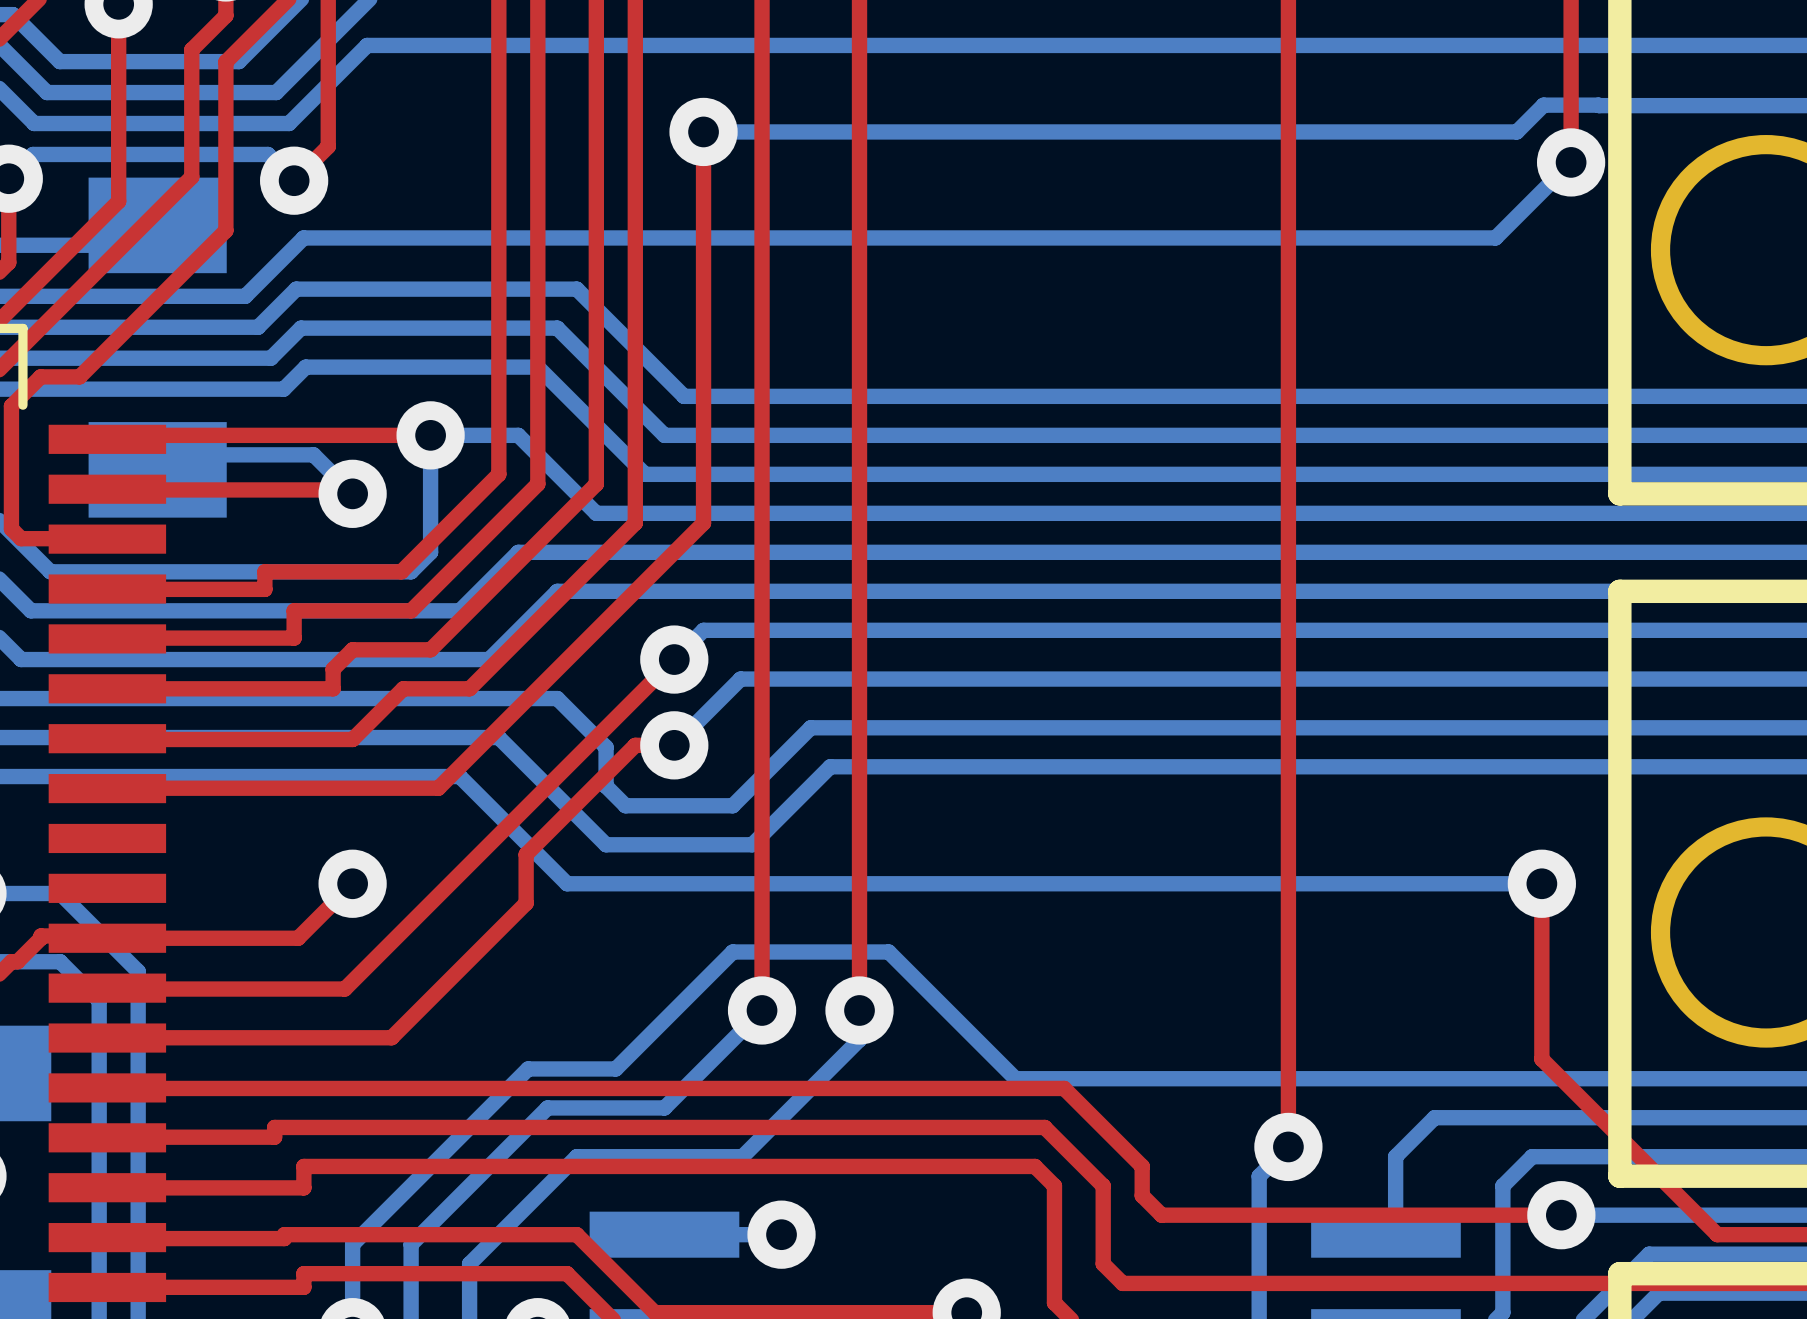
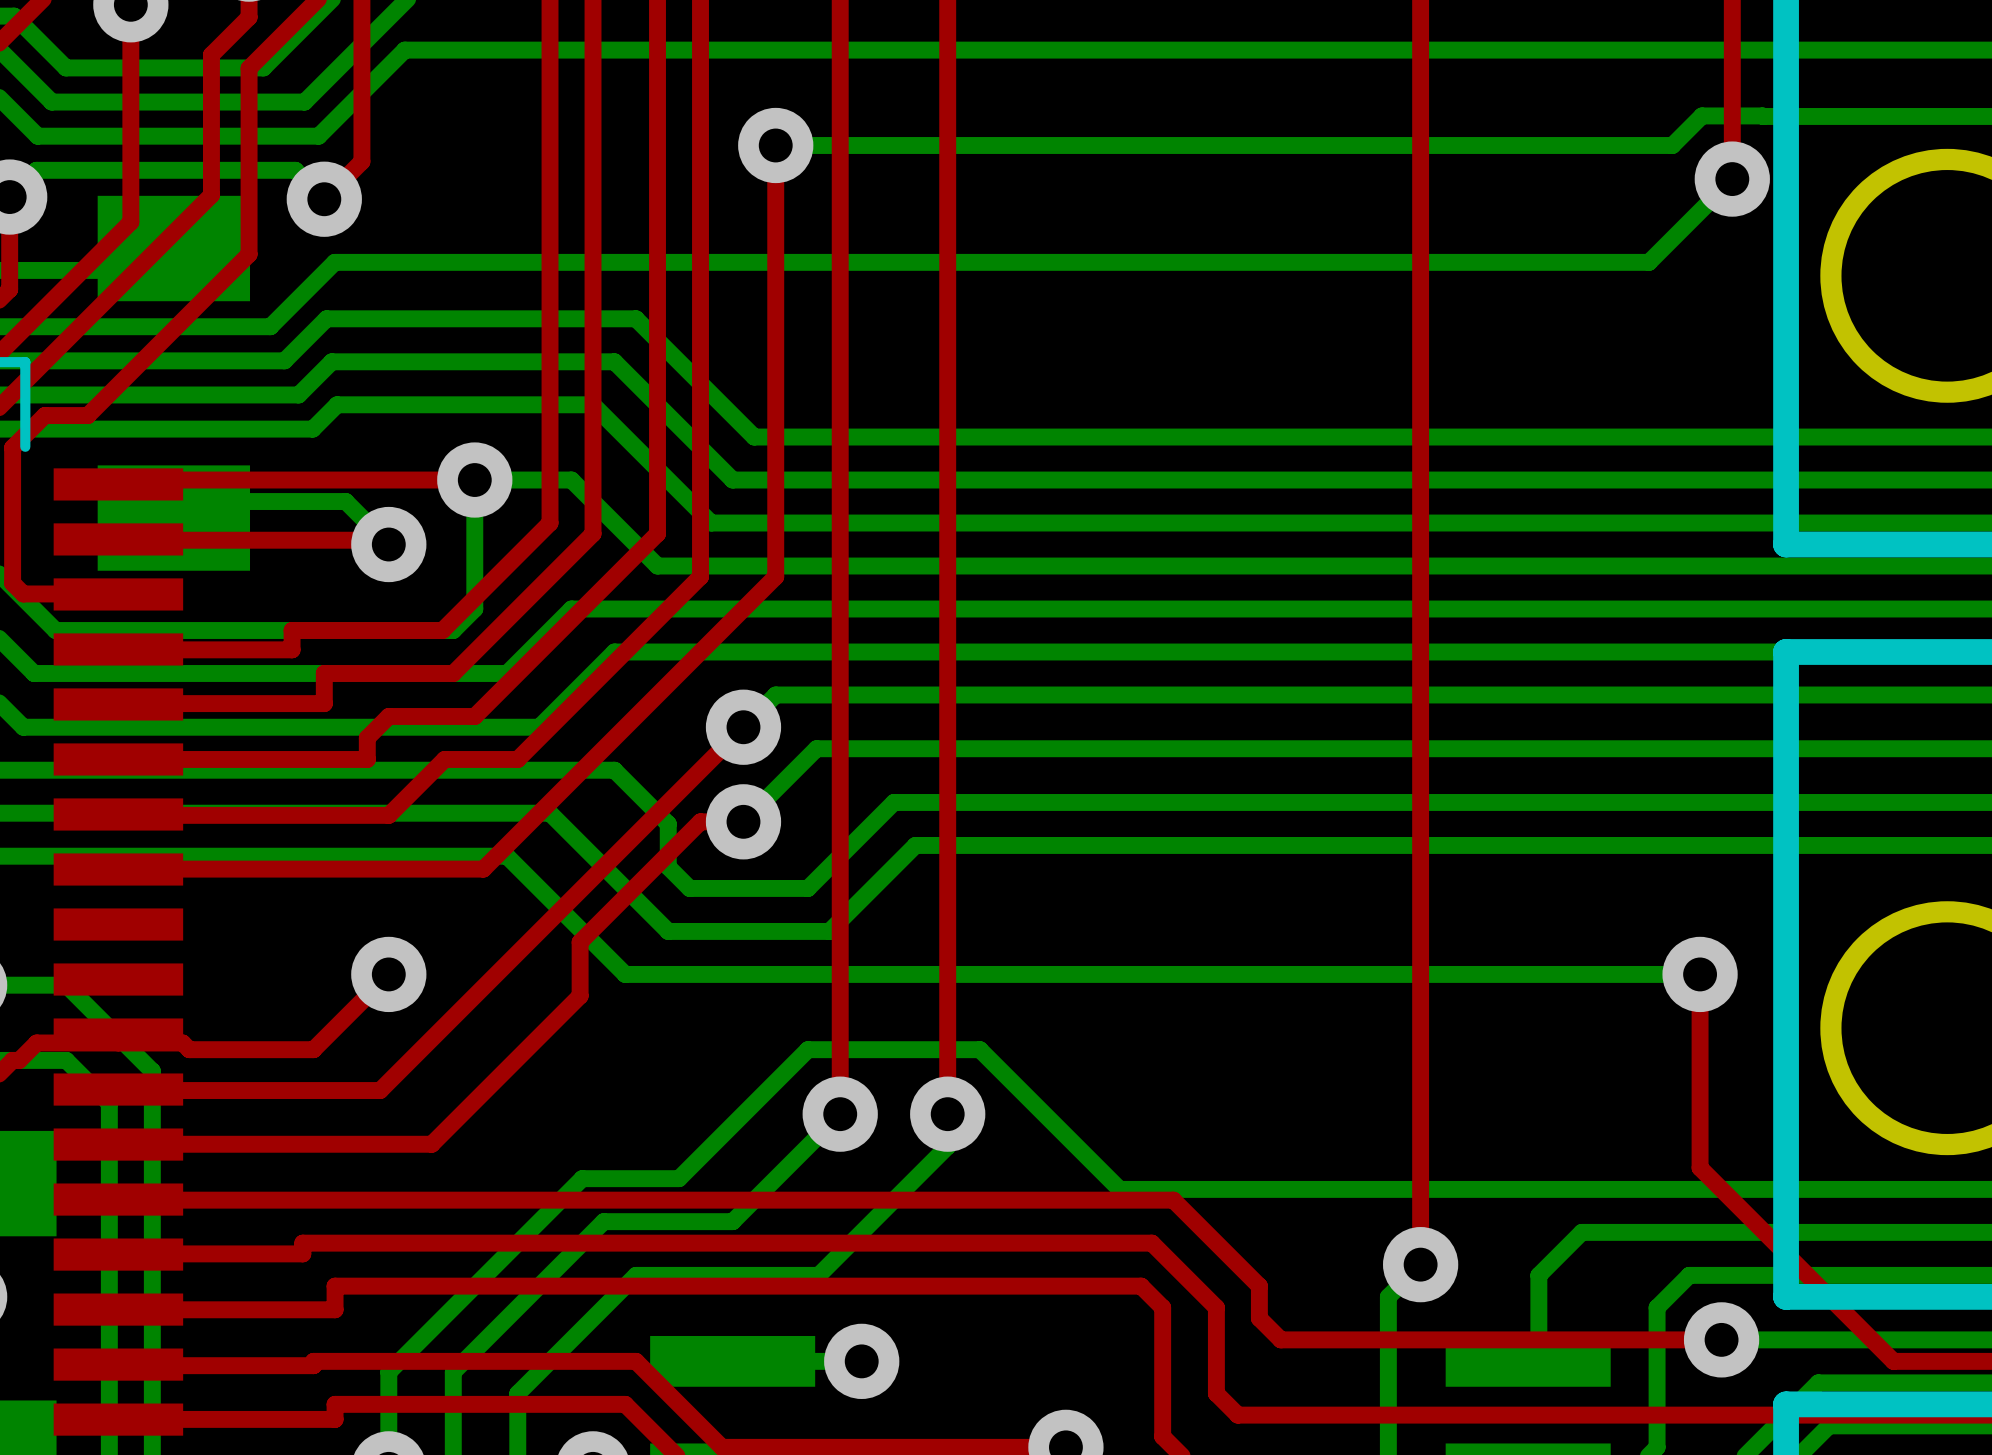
top track: (298, 938) (107, 938) (105, 935) (40, 935) (33, 945) -> (328, 1034) (313, 1049) (189, 1049) (182, 1042) (36, 1042)

